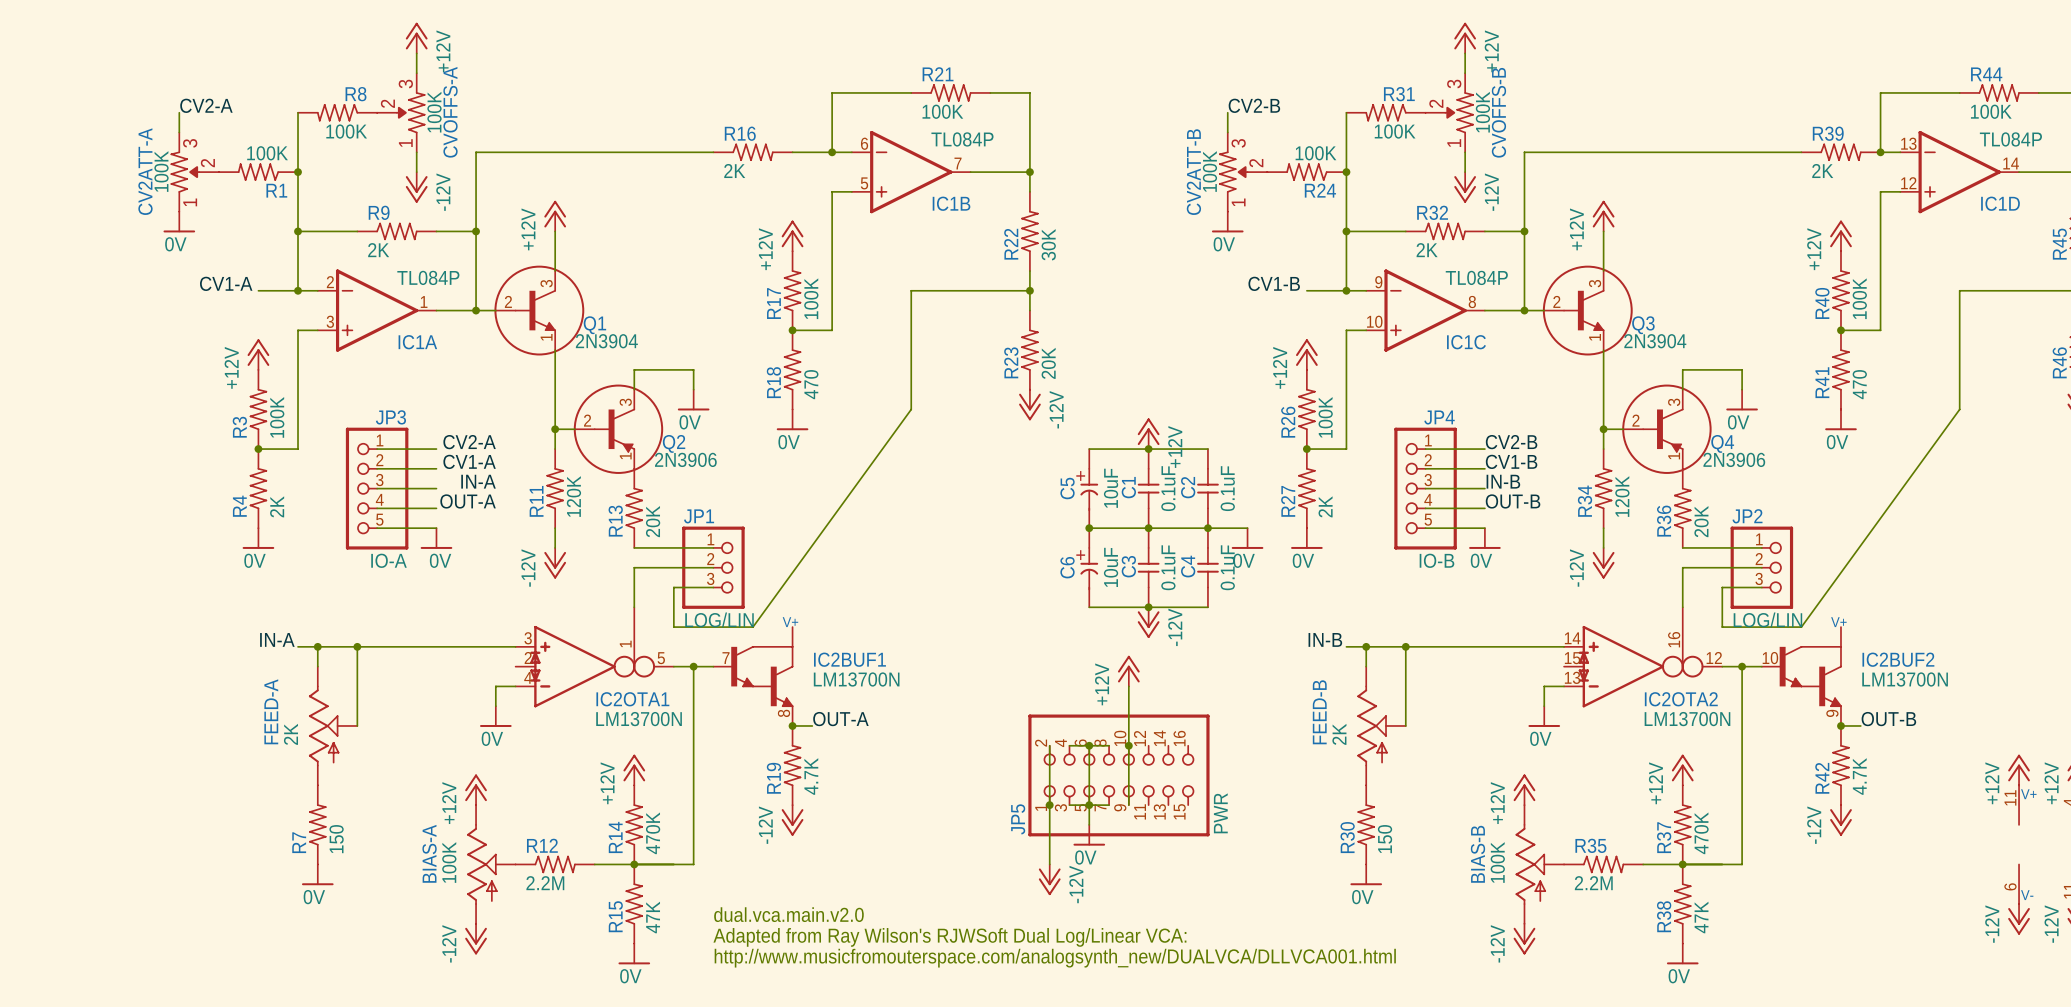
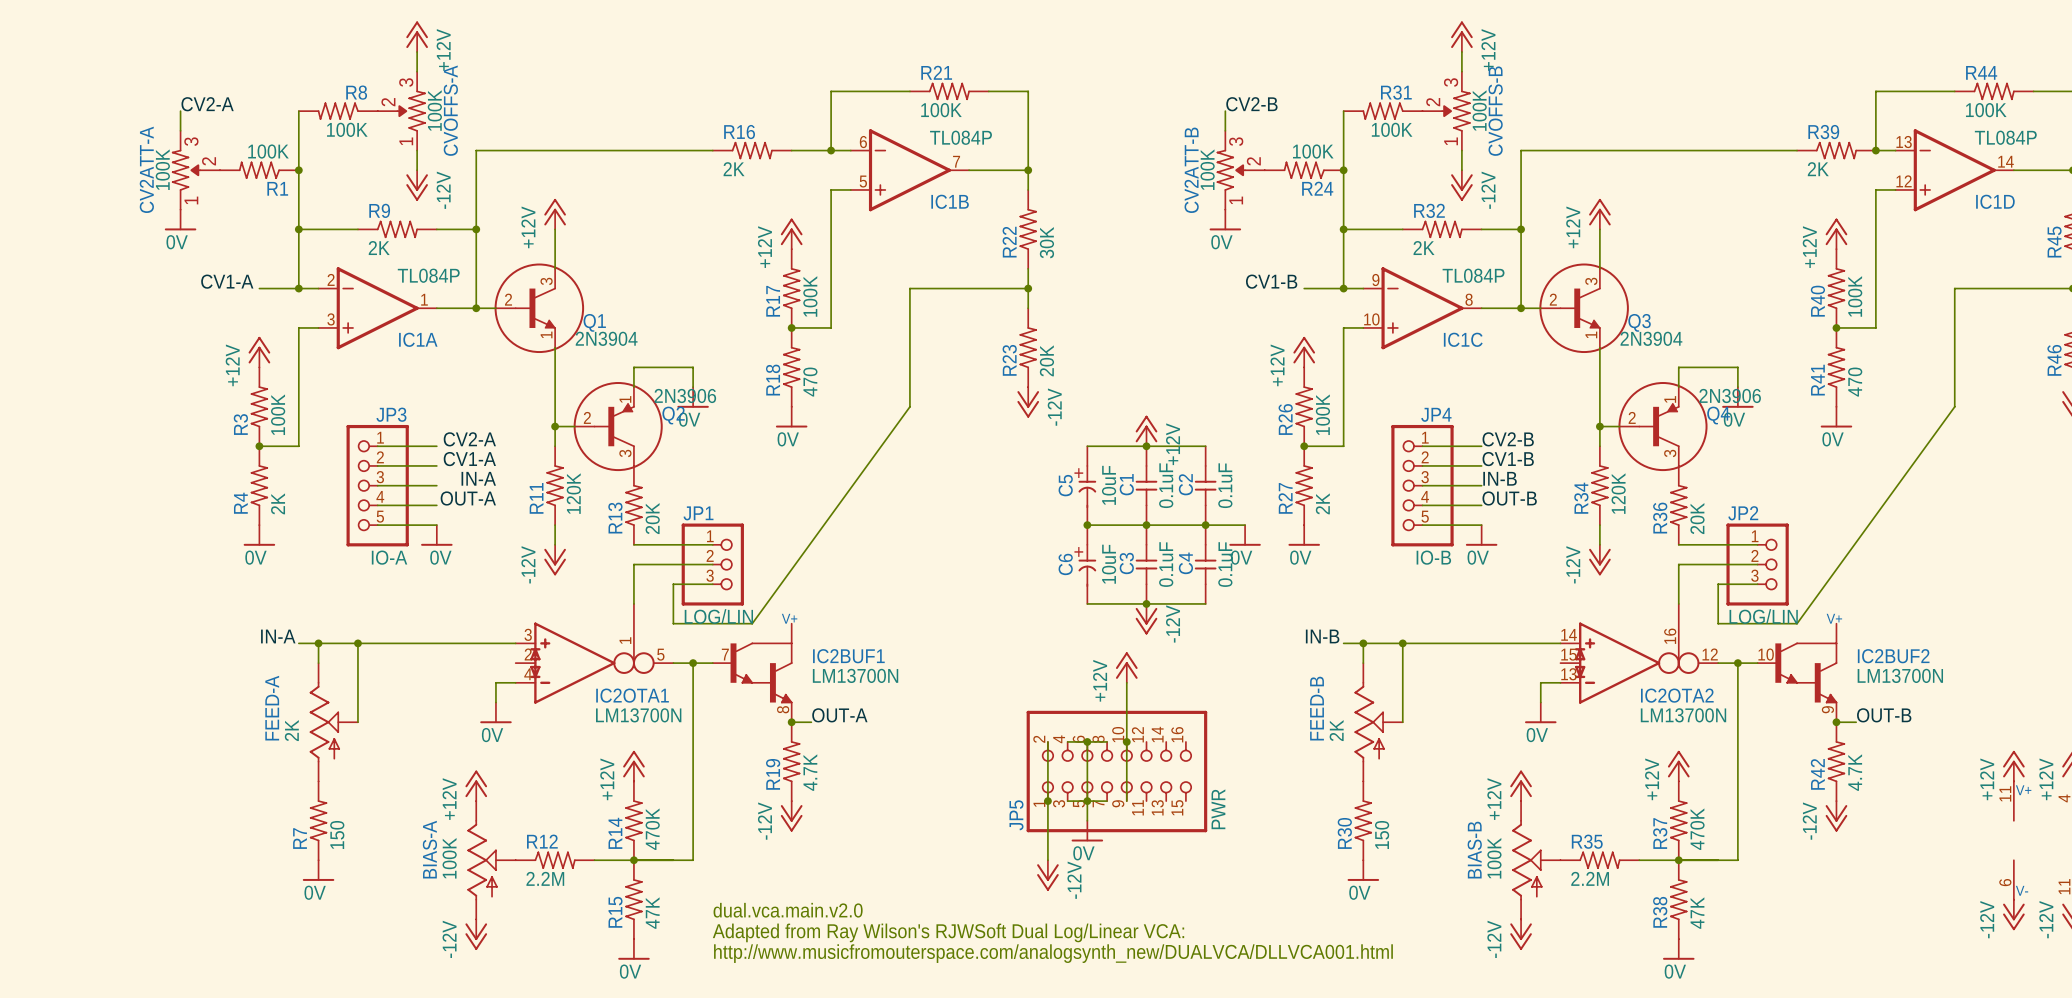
Q2 flip: as is (618, 429) -> up-down (618, 426)
Q4 flip: as is (1666, 429) -> up-down (1662, 426)

